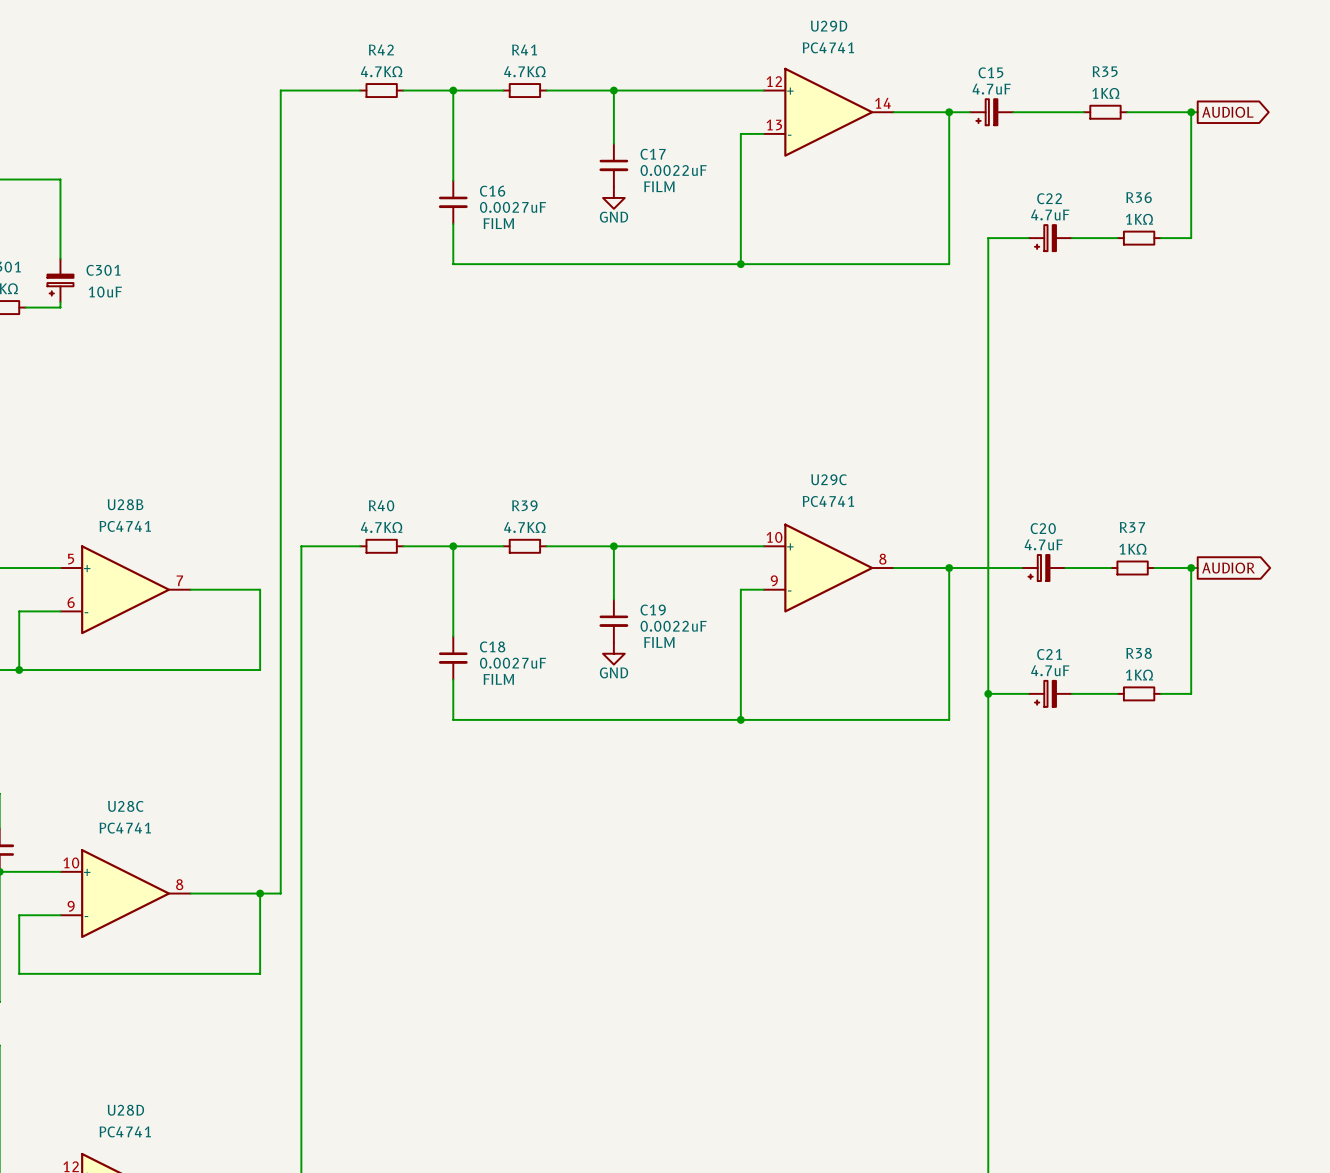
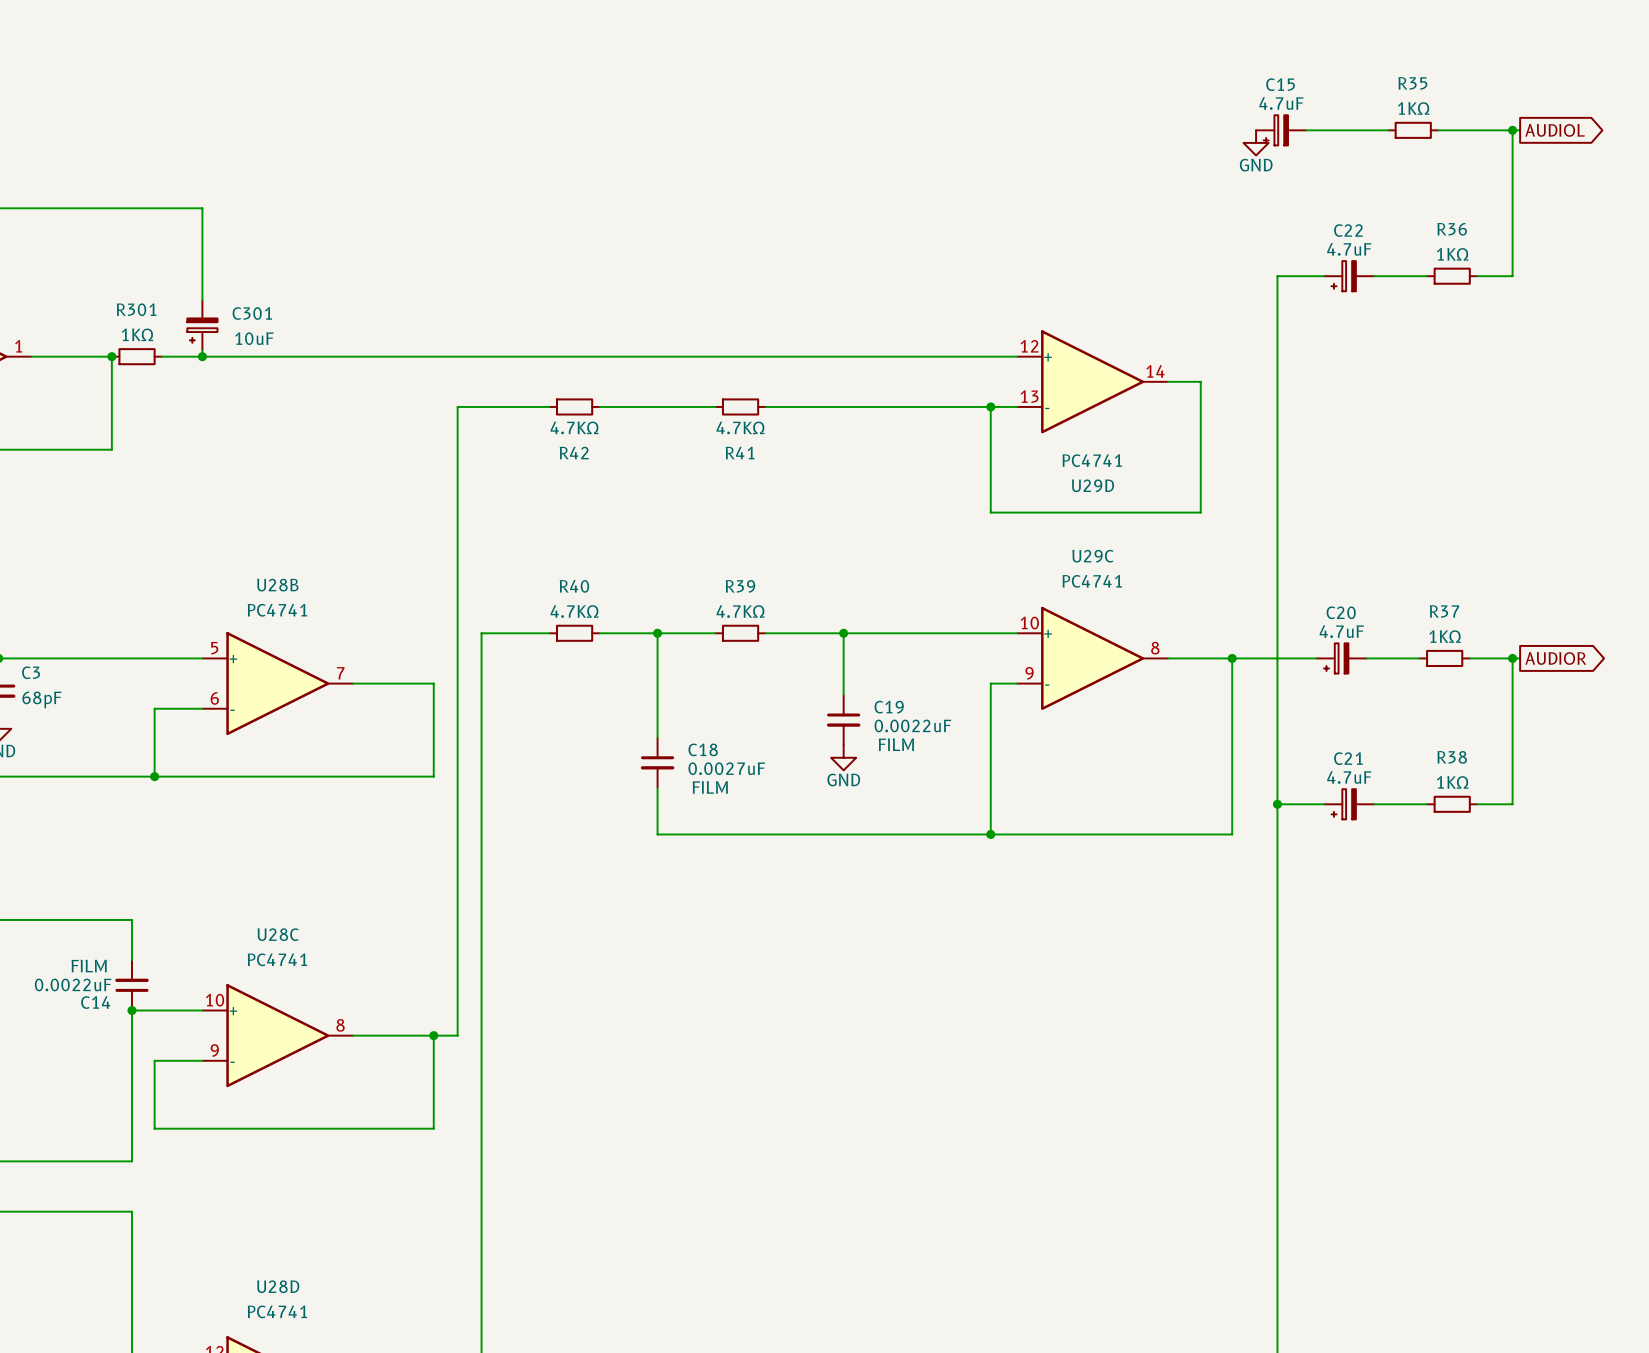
U29D name position: U29D (829, 26) -> U29D (1092, 485)
U29D value position: PC4741 (828, 47) -> PC4741 (1092, 460)
R42 name position: R42 (381, 49) -> R42 (574, 453)
R41 name position: R41 (524, 49) -> R41 (740, 453)
R42 value position: 4.7KΩ (381, 71) -> 4.7KΩ (574, 427)
R41 value position: 4.7KΩ (524, 71) -> 4.7KΩ (740, 427)
wire: (359, 90) (280, 90) (280, 350) -> (549, 406) (457, 406)
R42 position: (381, 90) -> (574, 406)
wire: (403, 90) (503, 90) -> none
wire: (453, 90) (453, 180) -> none
junction: (453, 90) -> none
R41 position: (524, 90) -> (740, 406)
wire: (546, 90) (763, 90) -> none
wire: (613, 90) (613, 143) -> none
junction: (613, 90) -> none
U29D position: (828, 112) -> (1092, 381)
wire: (893, 112) (969, 112) -> none
wire: (949, 112) (949, 264) (453, 264) (453, 224) -> none
junction: (949, 112) -> none
power symbol: none -> GND (1256, 142)
wire: (763, 133) (740, 133) (740, 264) -> none
C17: 0.0022uF (613, 165) -> none
power symbol: GND (613, 197) -> none
C16: 0.0027uF (453, 202) -> none
junction: (740, 264) -> none
wire: none -> (202, 356) (1017, 356)
junction: none -> (202, 356)
wire: none -> (1168, 381) (1200, 381) (1200, 512) (990, 512) (990, 406)
wire: none -> (599, 406) (715, 406)
wire: none -> (765, 406) (1017, 406)
junction: none -> (990, 406)

